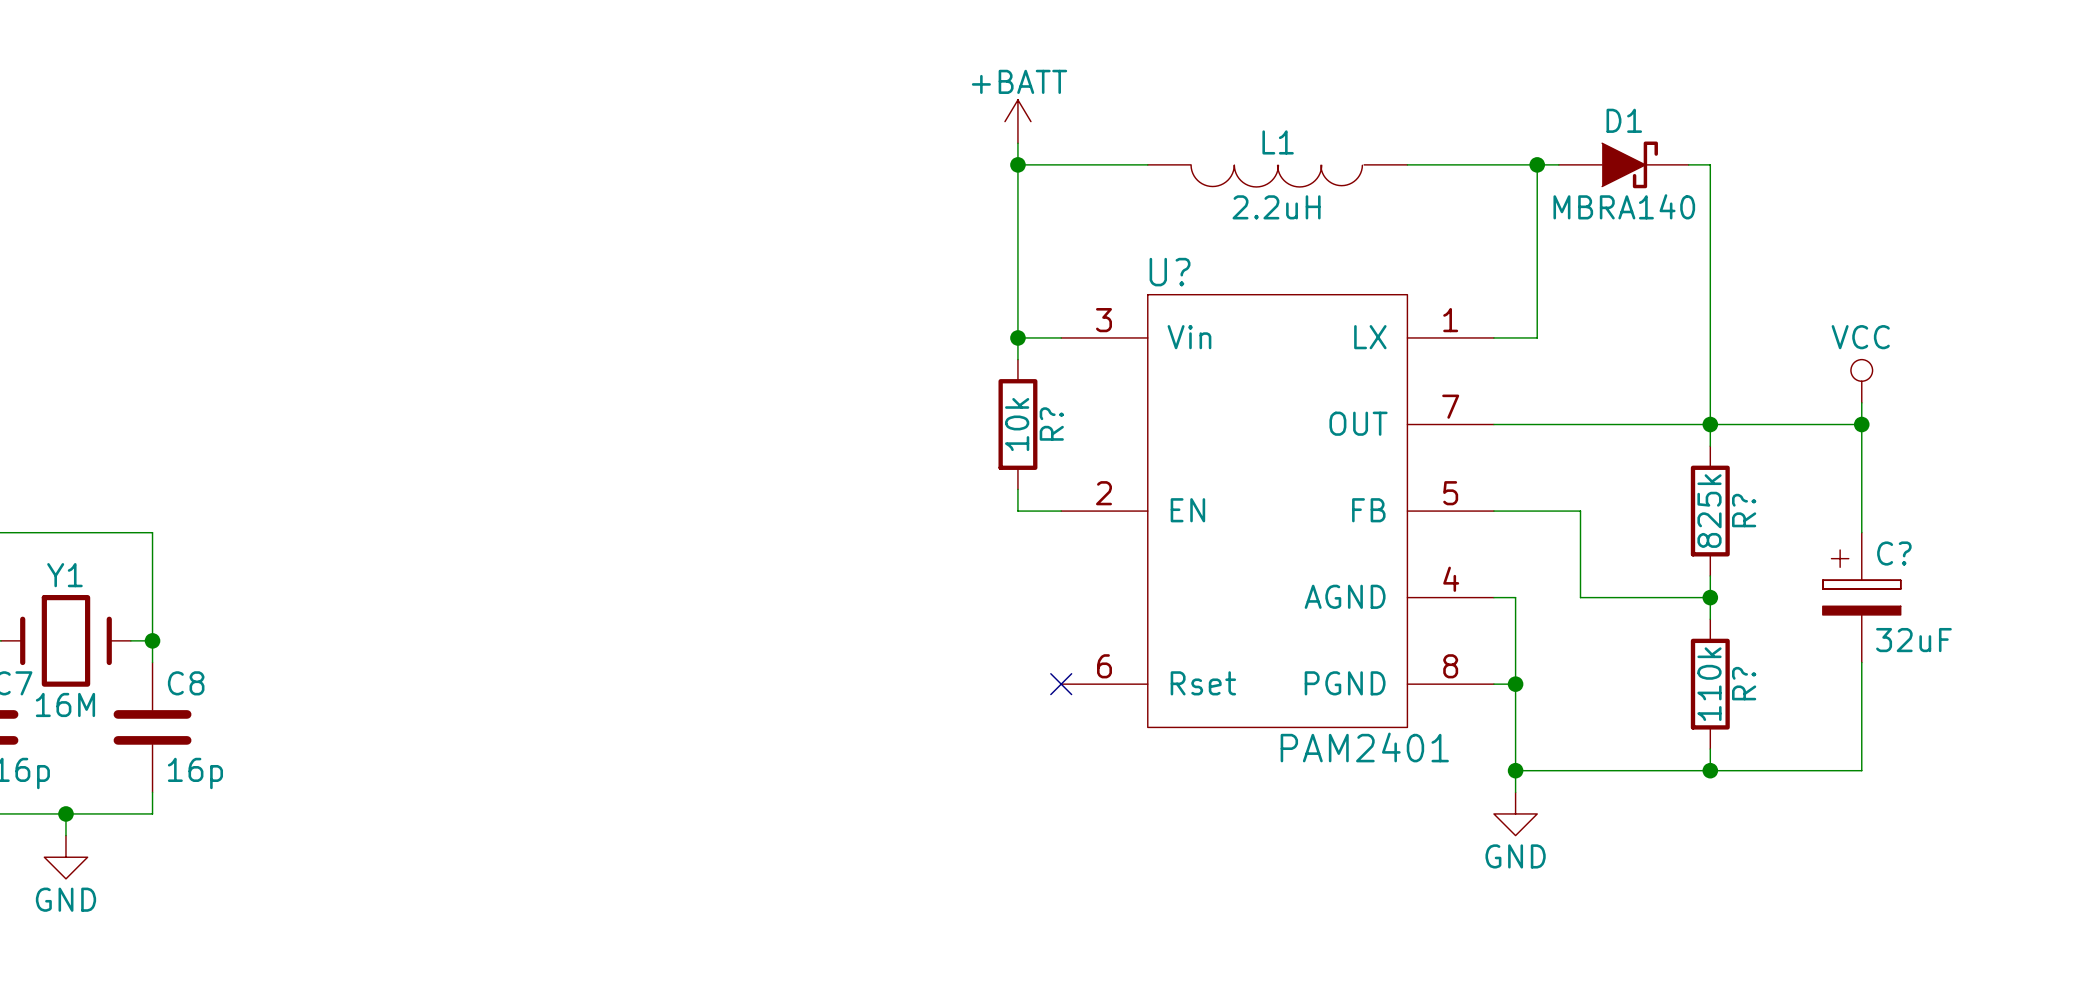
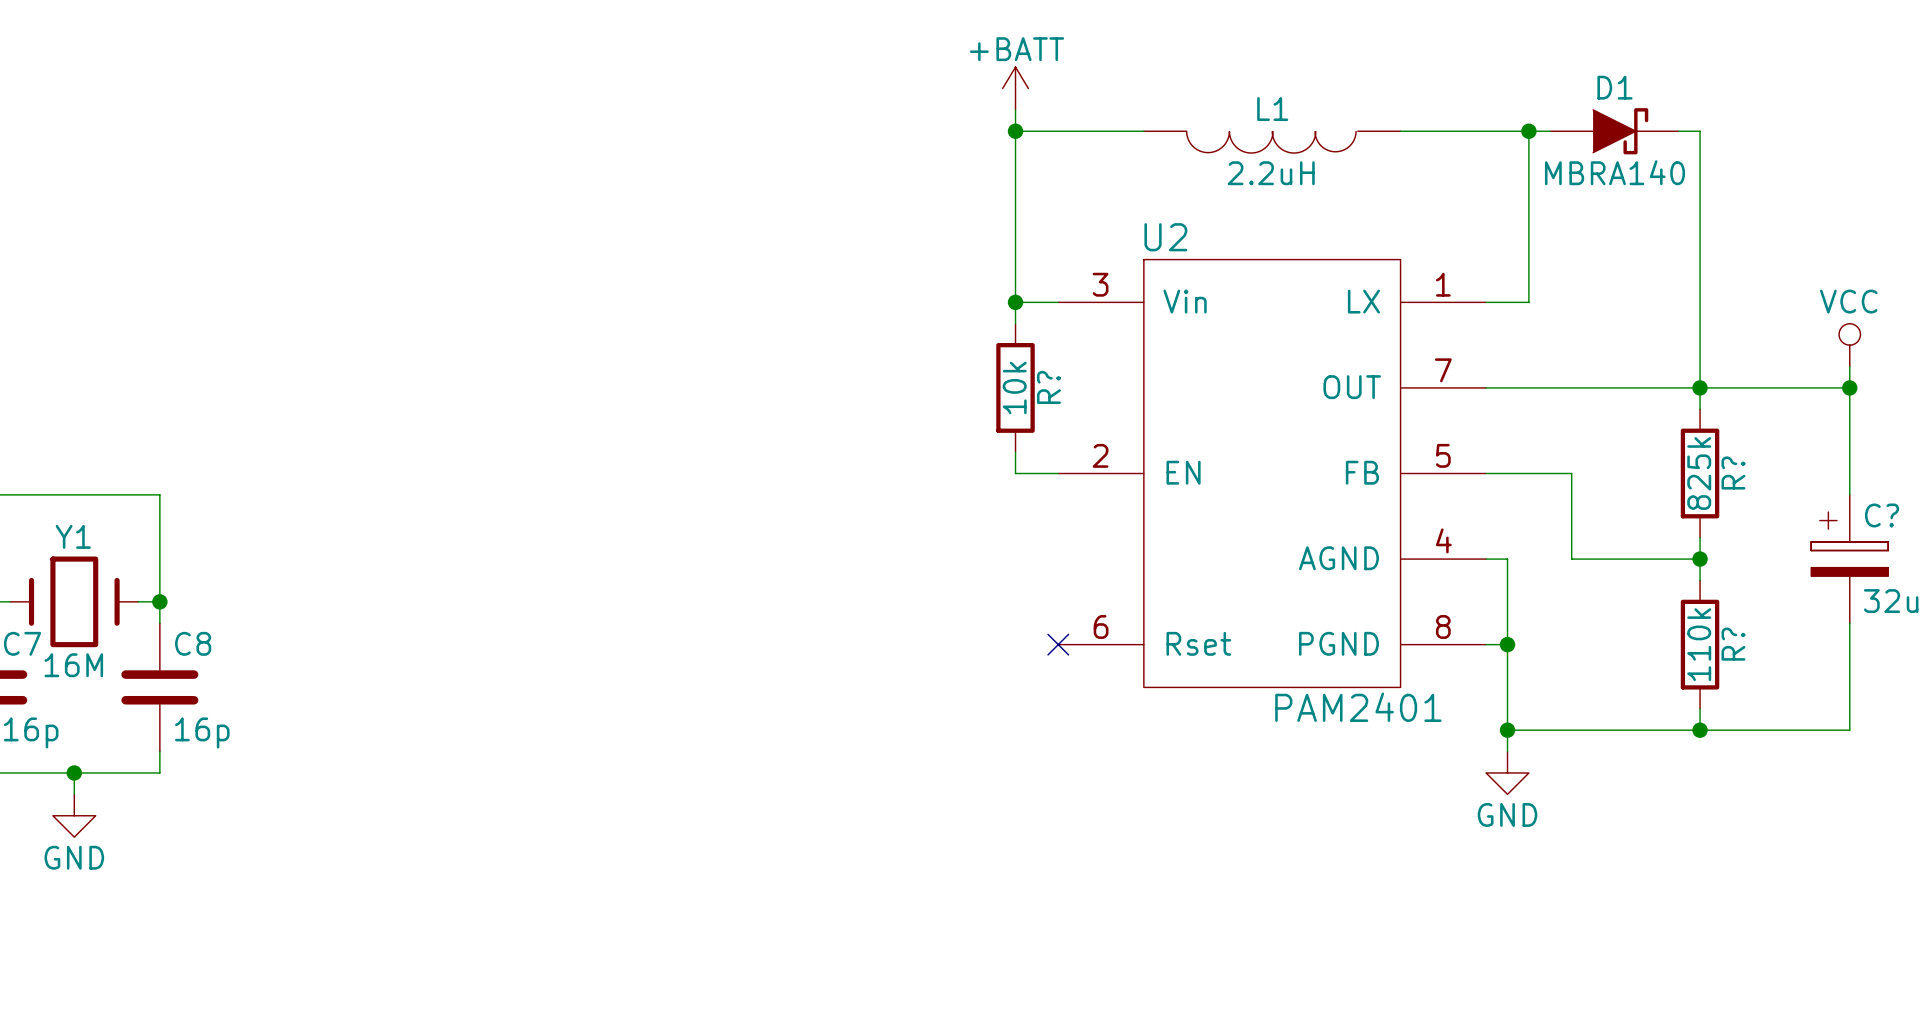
U? name: U? (1170, 272) -> U2 (1165, 237)

